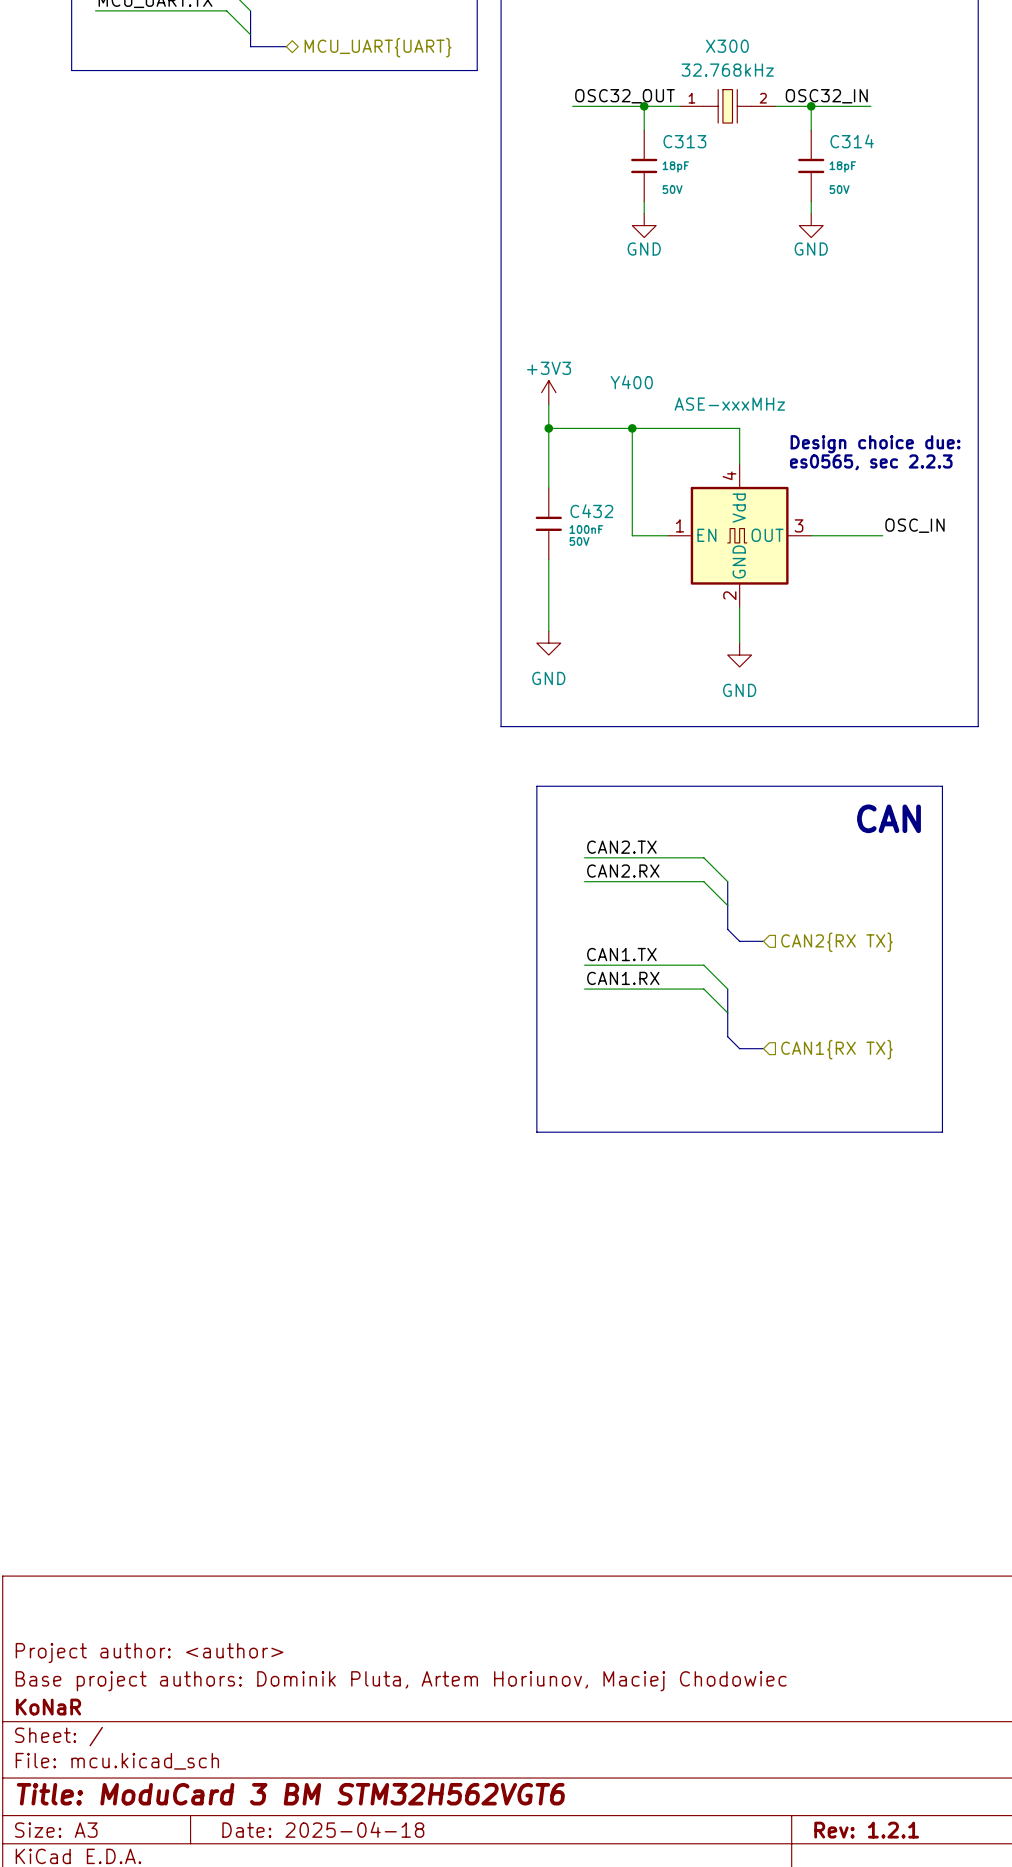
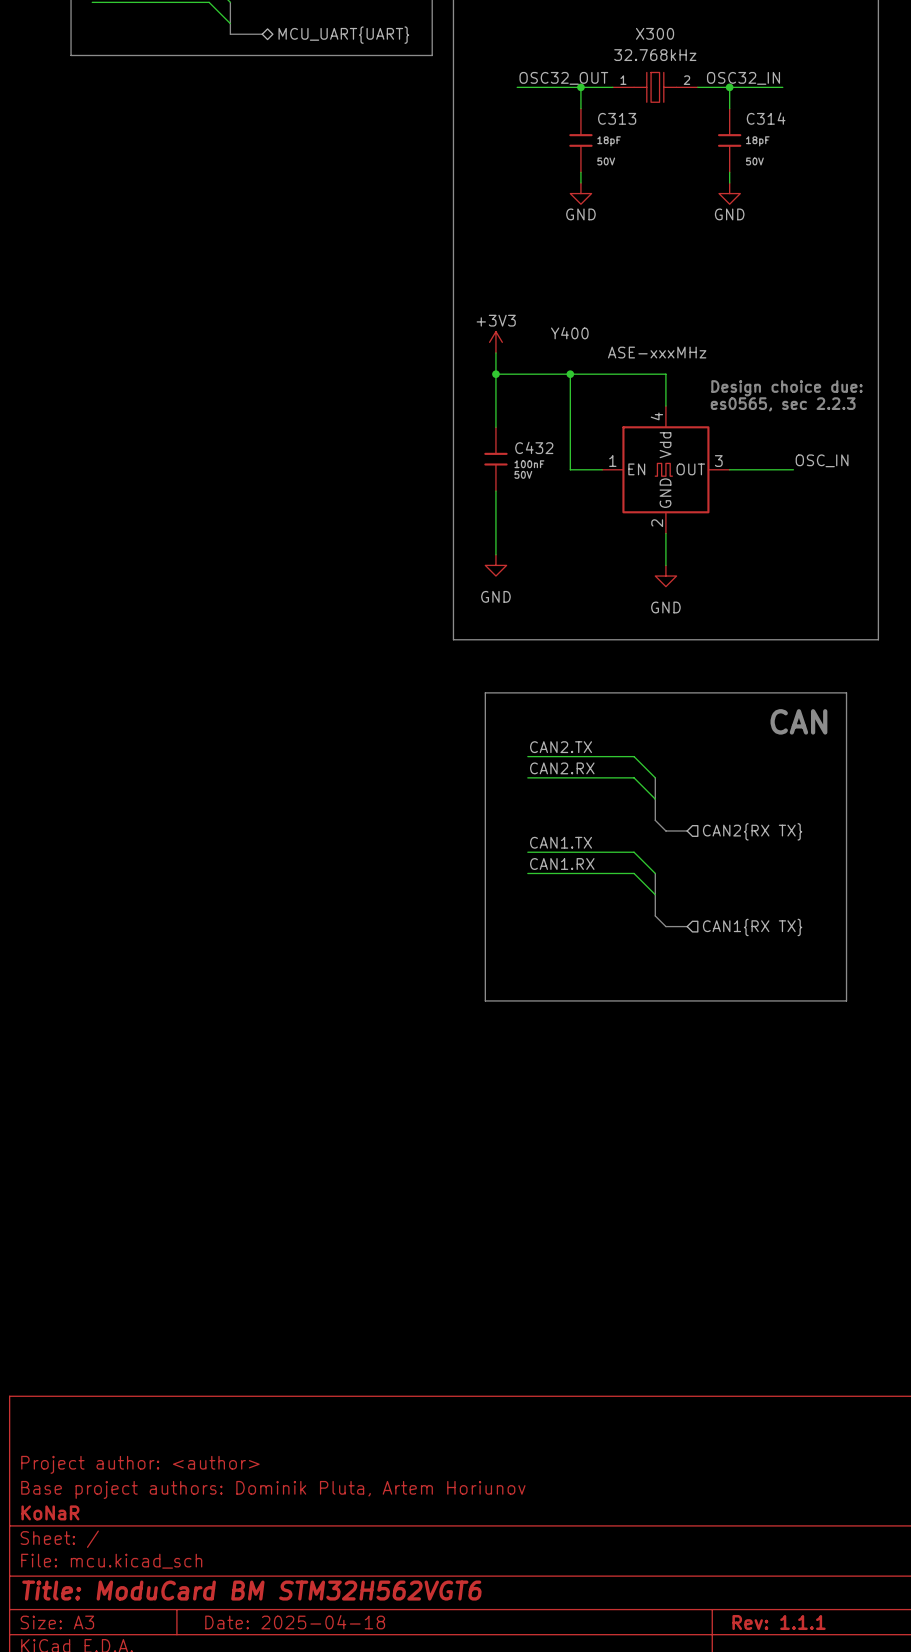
title block: Base project authors: Dominik Pluta, Artem Horiunov, Maciej Chodowiec (401, 1681) -> Base project authors: Dominik Pluta, Artem Horiunov (273, 1489)
title block: Title: ModuCard 3 BM STM32H562VGT6 (290, 1794) -> Title: ModuCard BM STM32H562VGT6 (251, 1590)
title block: Rev: 1.2.1 (866, 1830) -> Rev: 1.1.1 (779, 1622)

